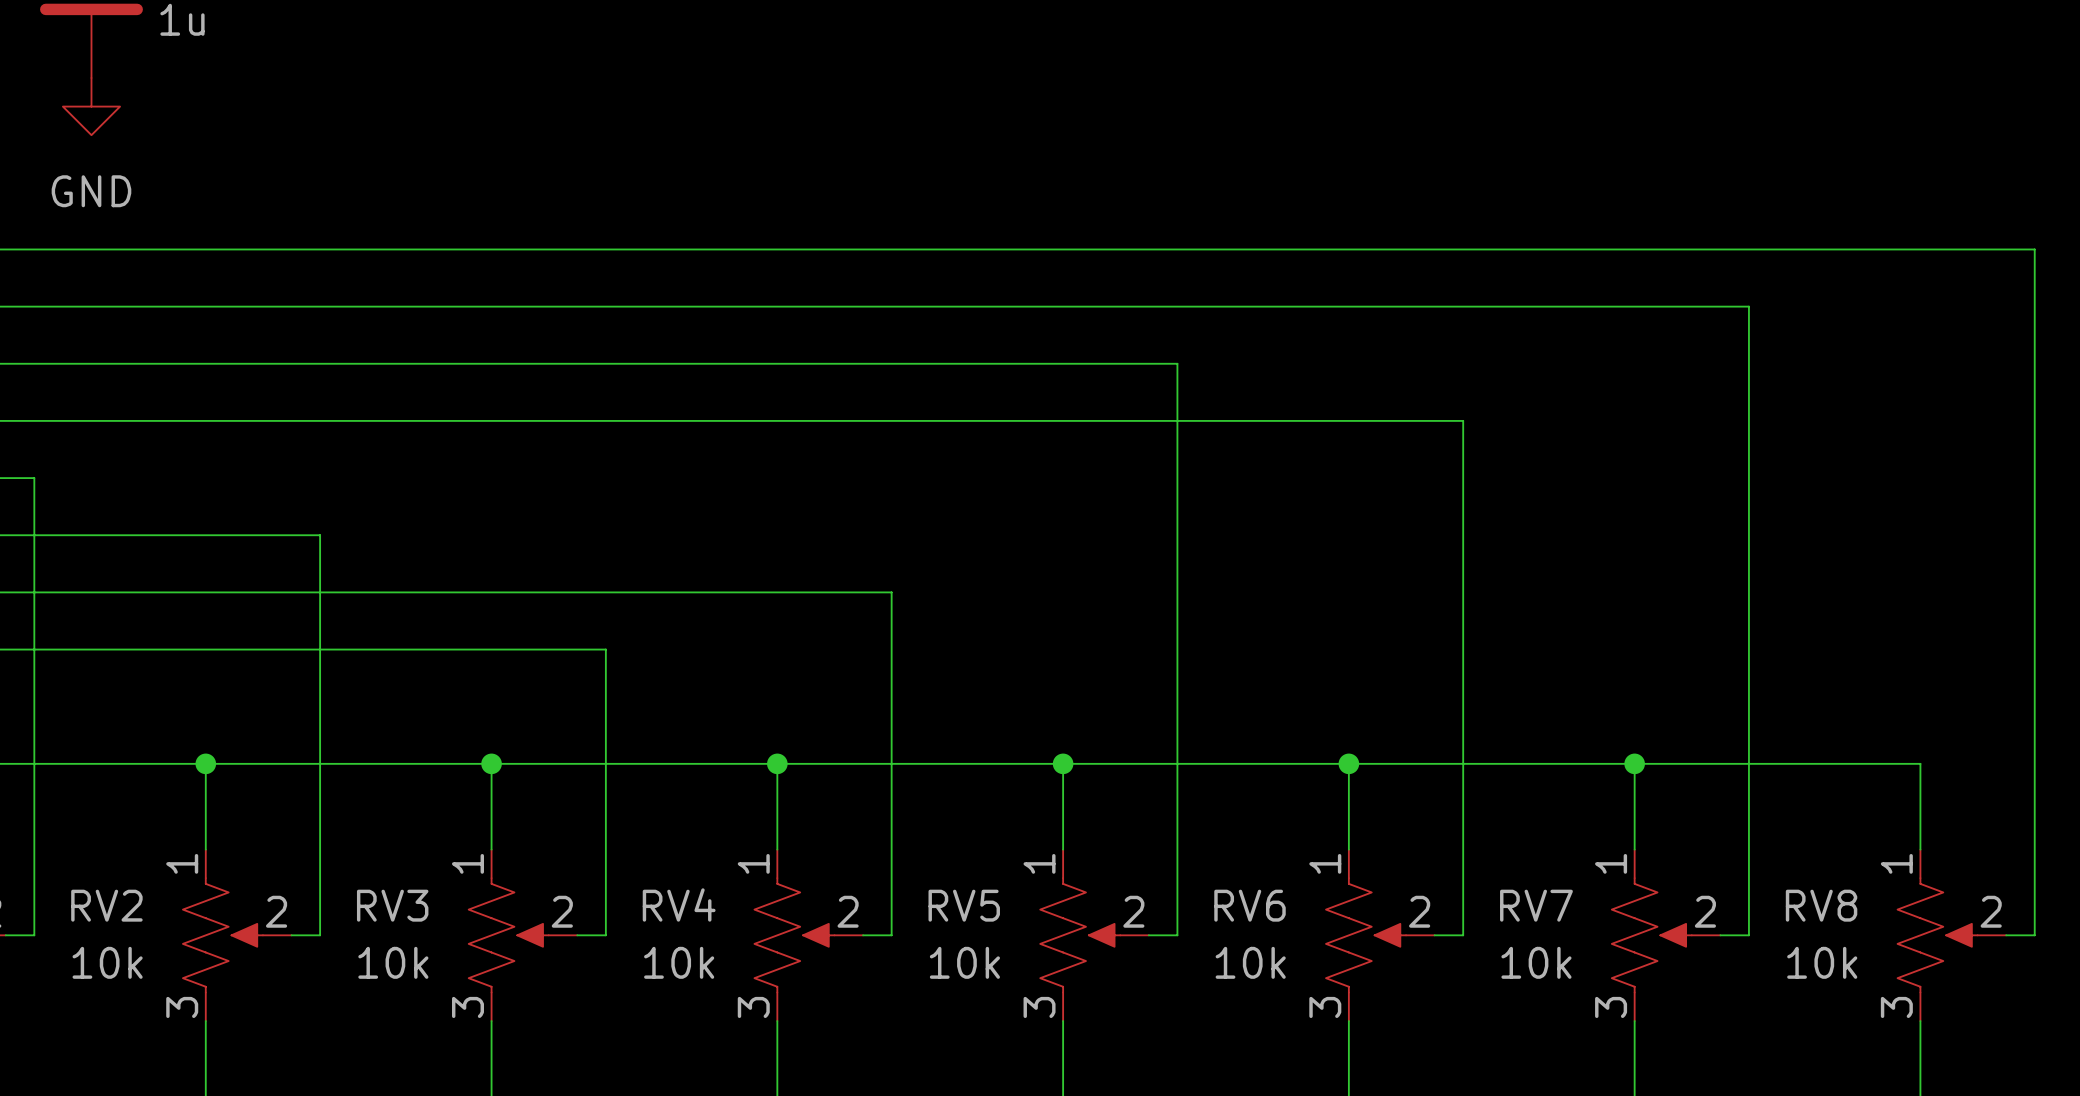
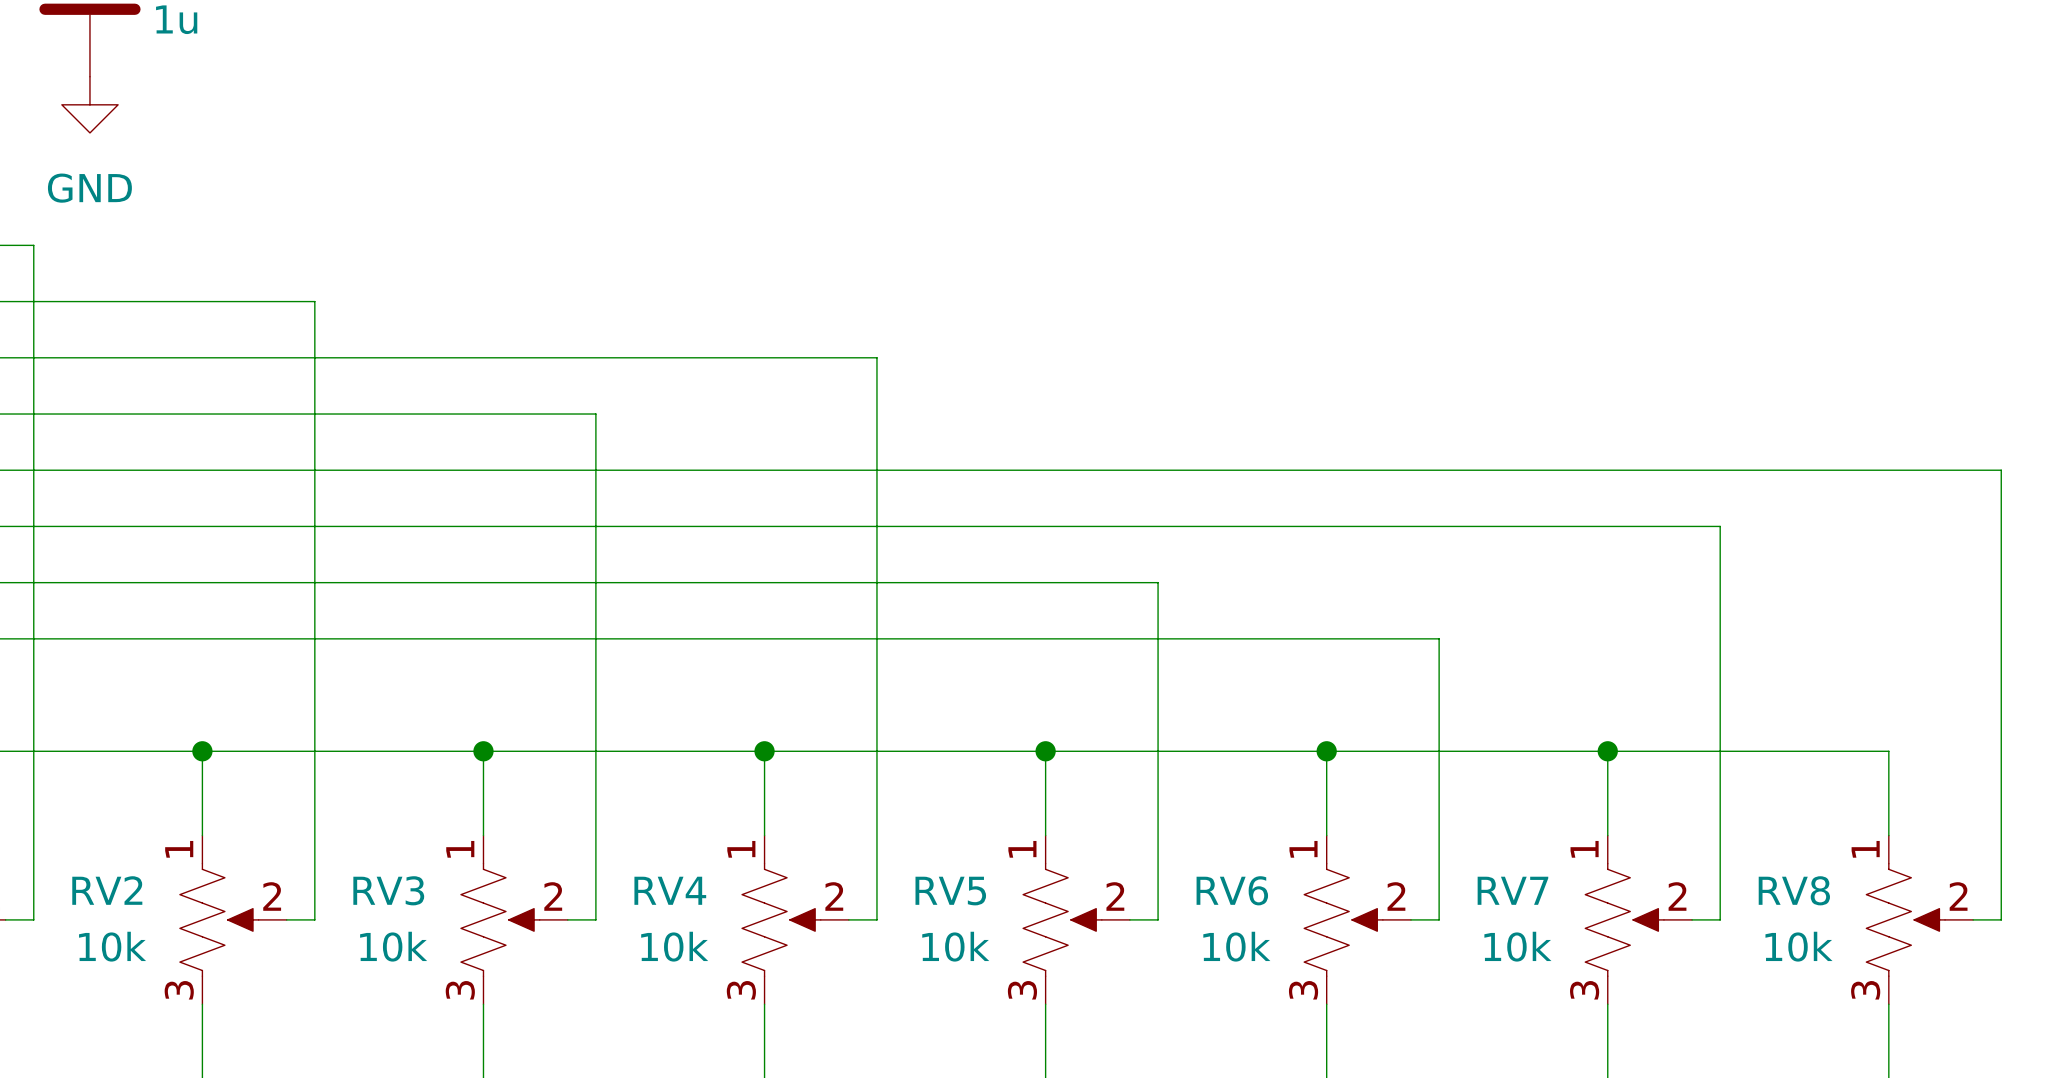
wire: (34, 249) (2034, 249) (2034, 478) -> (33, 245) (33, 470) (2001, 470)
wire: (320, 306) (1748, 306) (1748, 535) -> (314, 301) (314, 526) (1720, 526)
wire: (891, 363) (1177, 363) (1177, 592) -> (876, 357) (876, 582) (1158, 582)
wire: (605, 420) (1463, 420) (1463, 649) -> (595, 414) (595, 638) (1439, 638)

